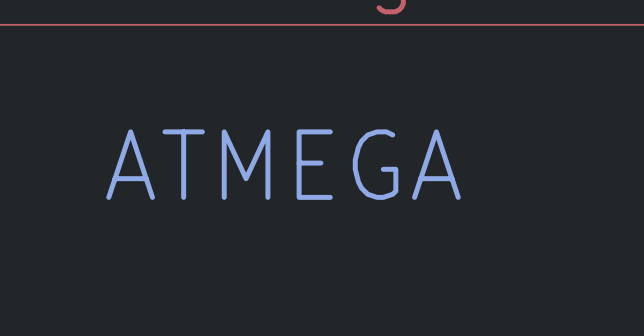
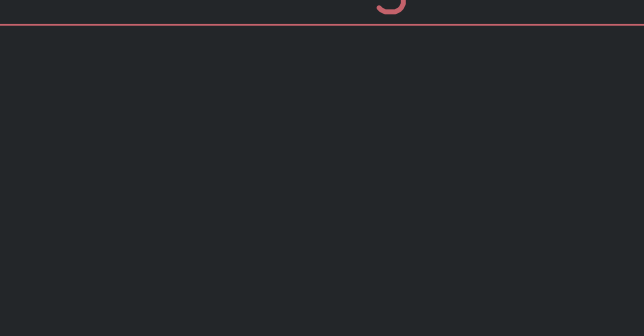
text: ATMEGA (283, 164) -> none

